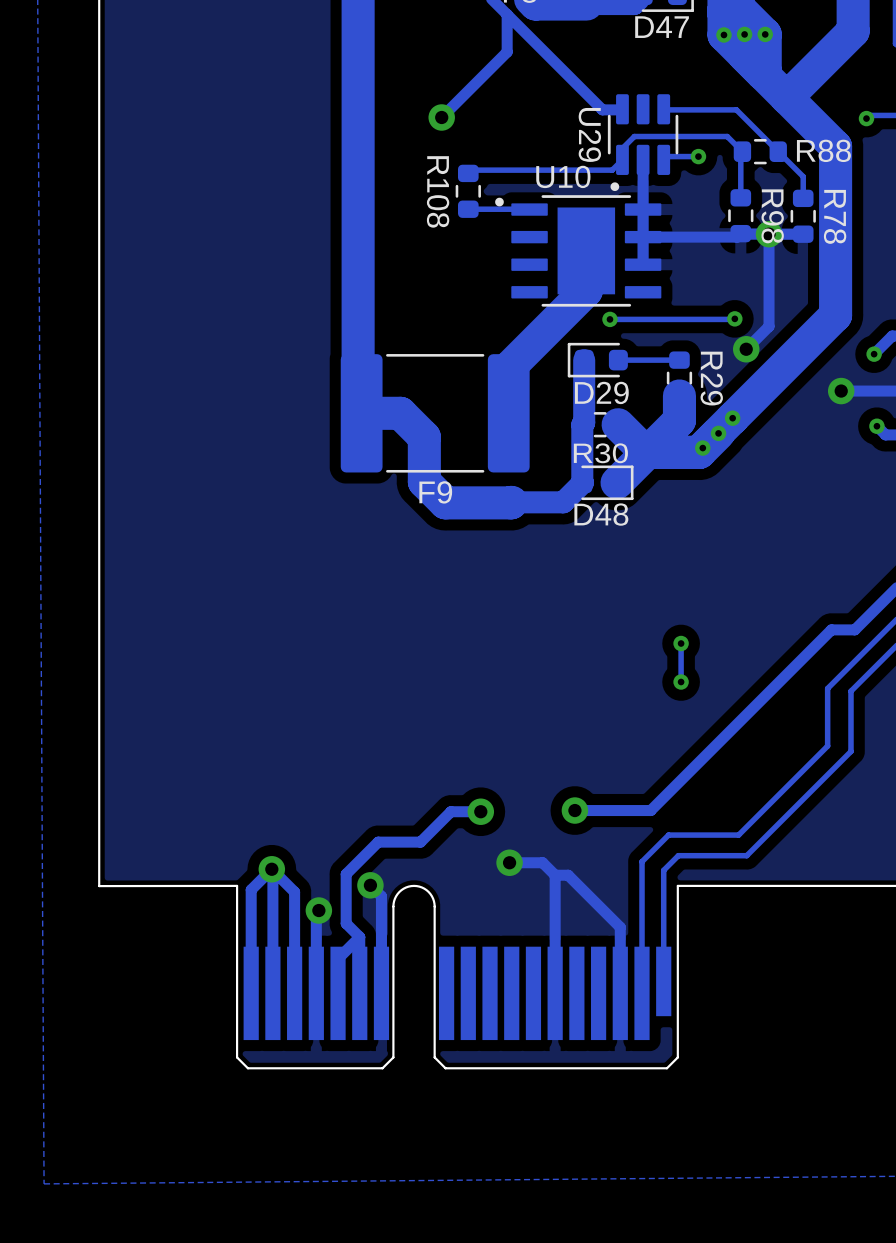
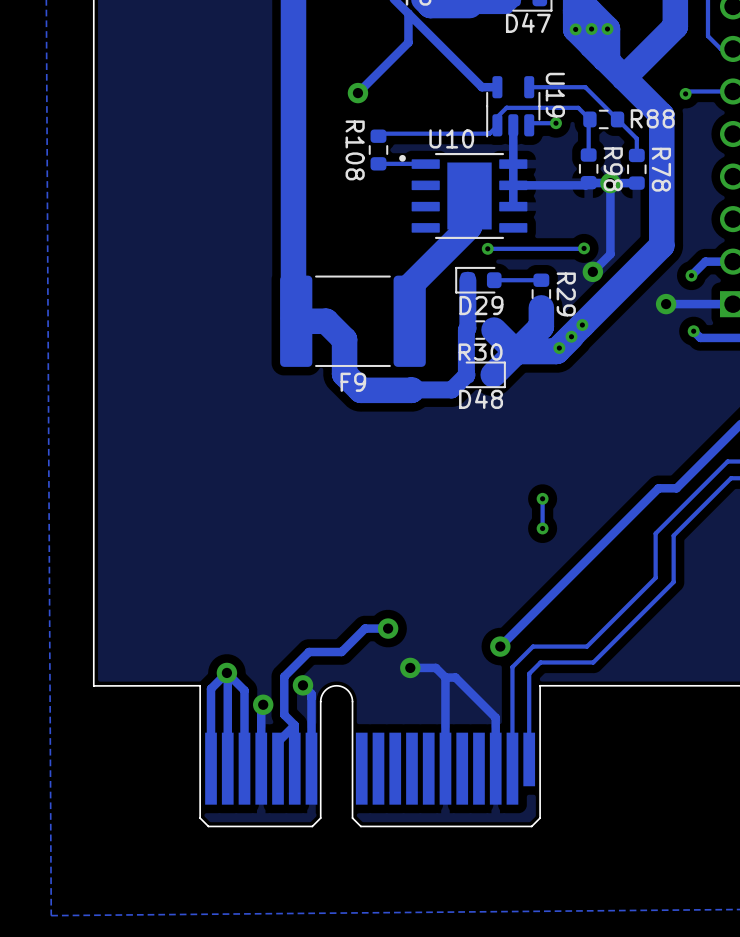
U19: none -> (513, 106)
U29: (643, 142) -> none
via position: (574, 810) -> (500, 646)
track: (650, 810) (574, 810) -> (519, 627) (500, 646)

